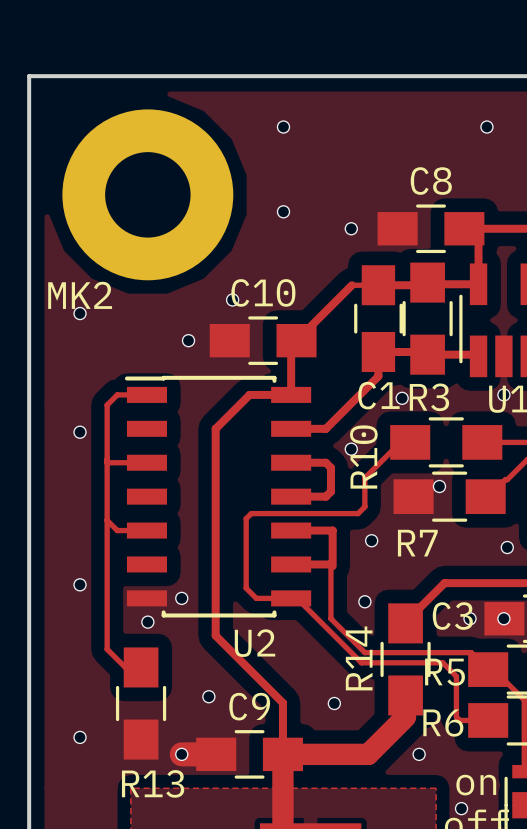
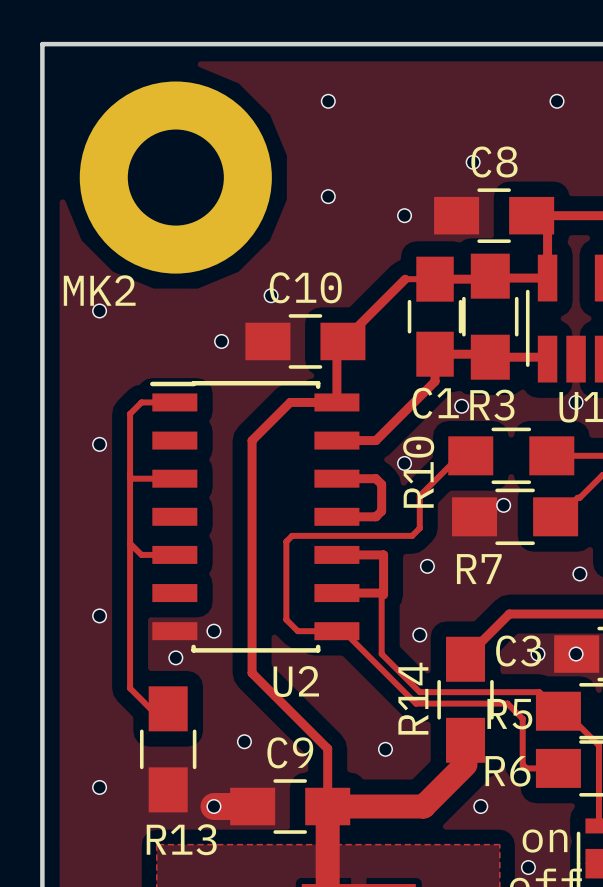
via: none -> (473, 162)

